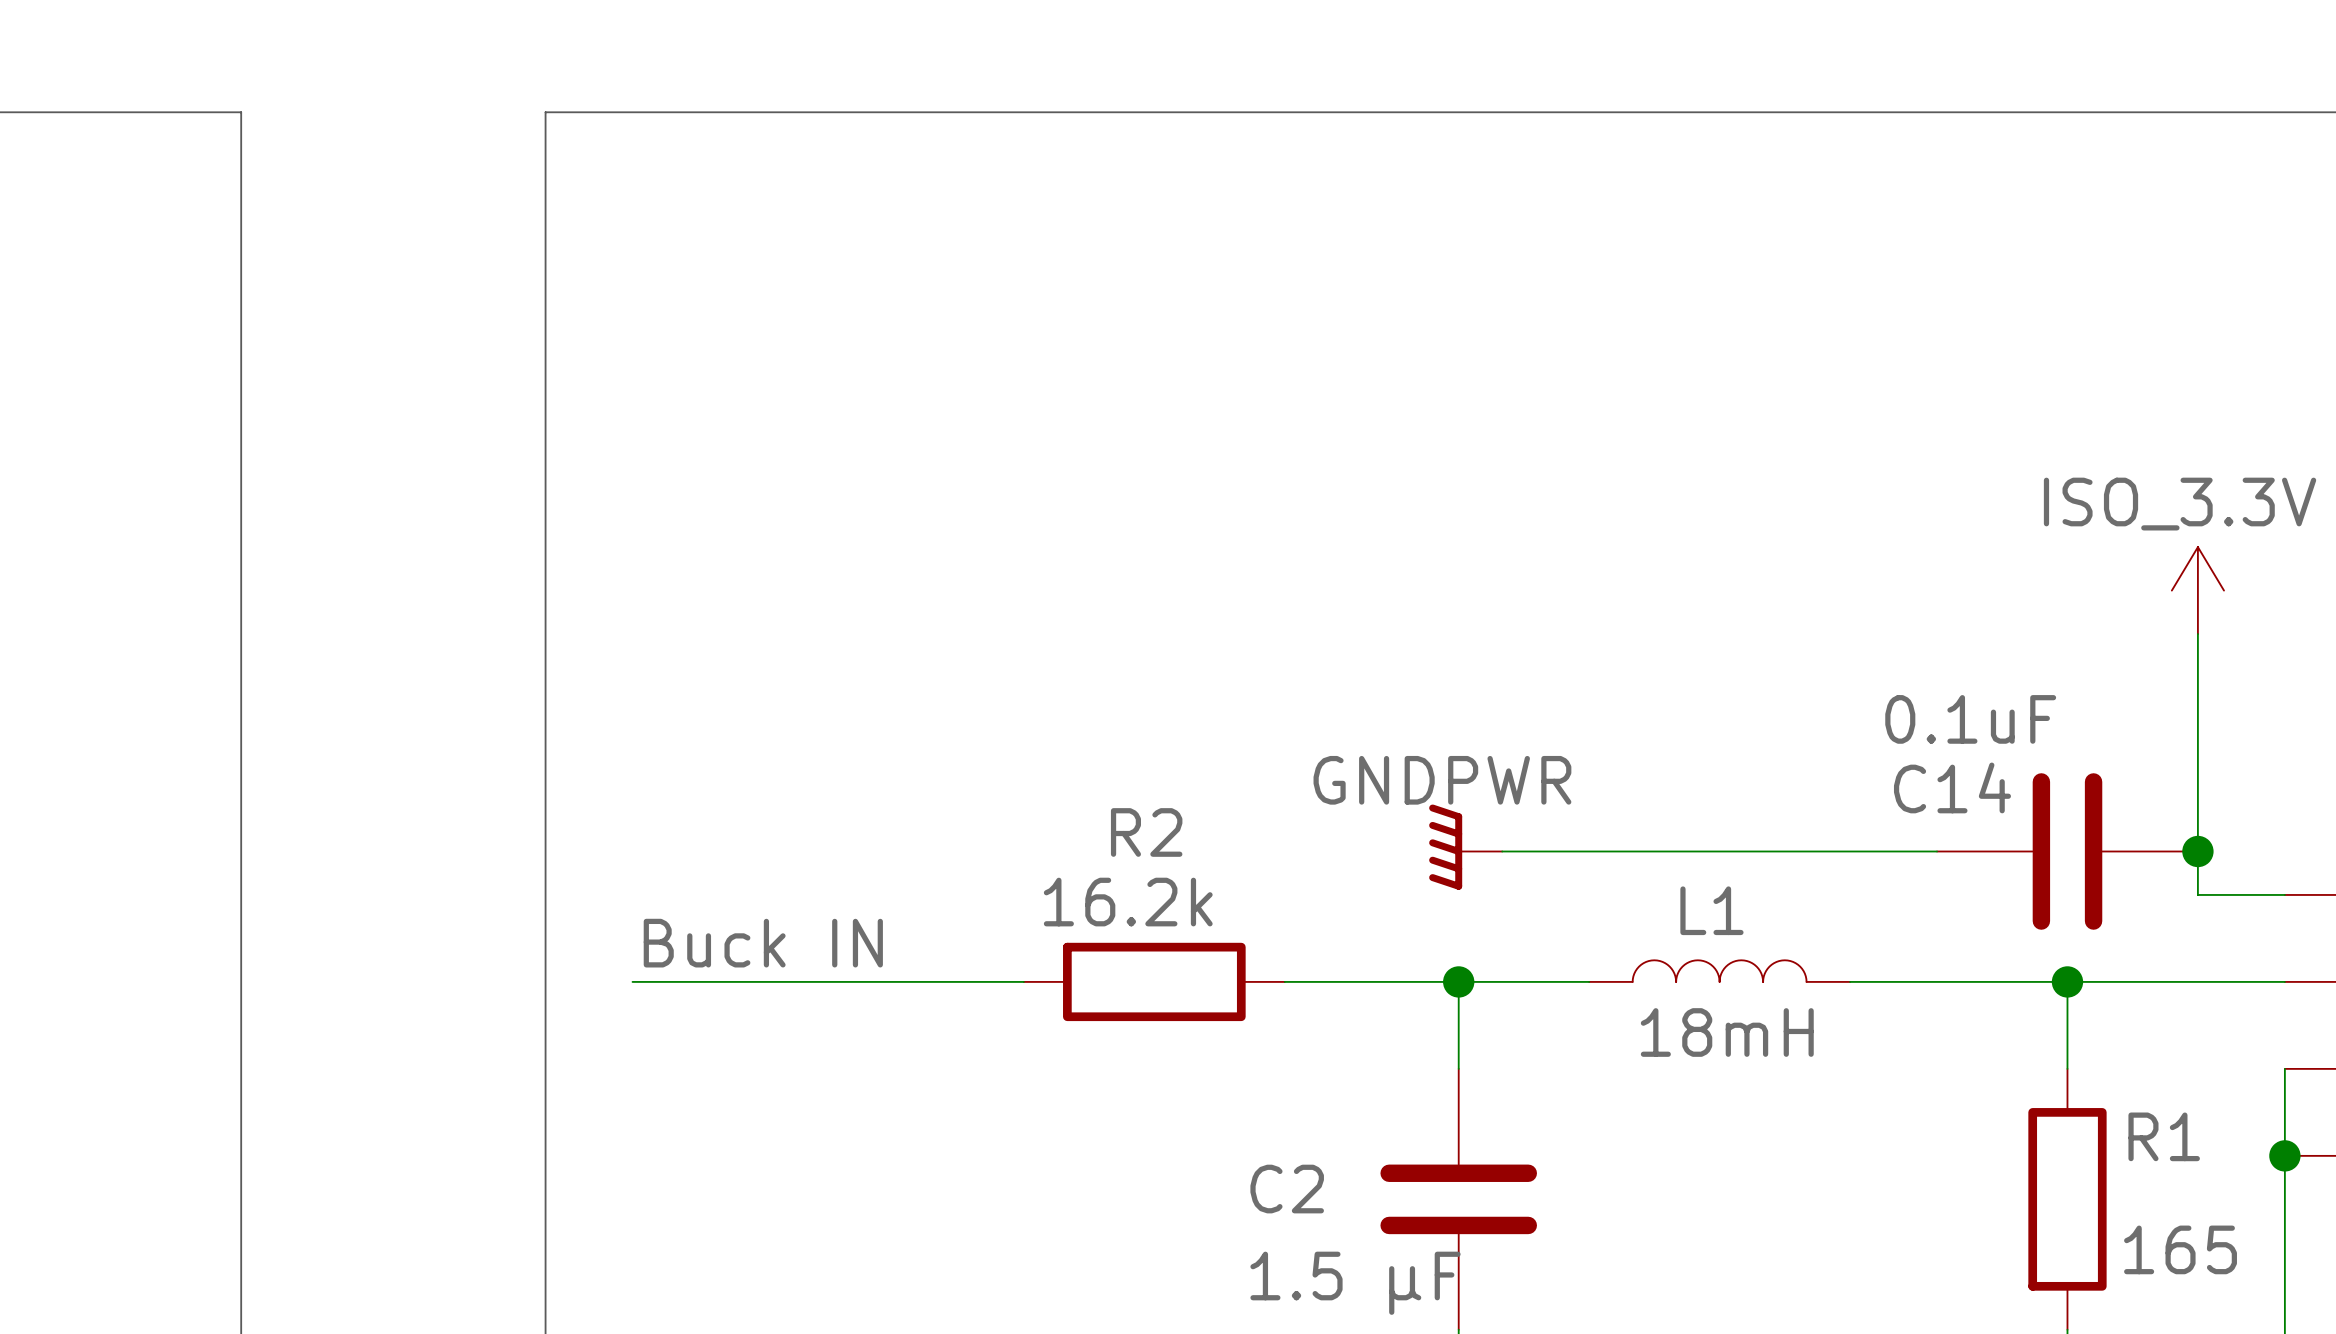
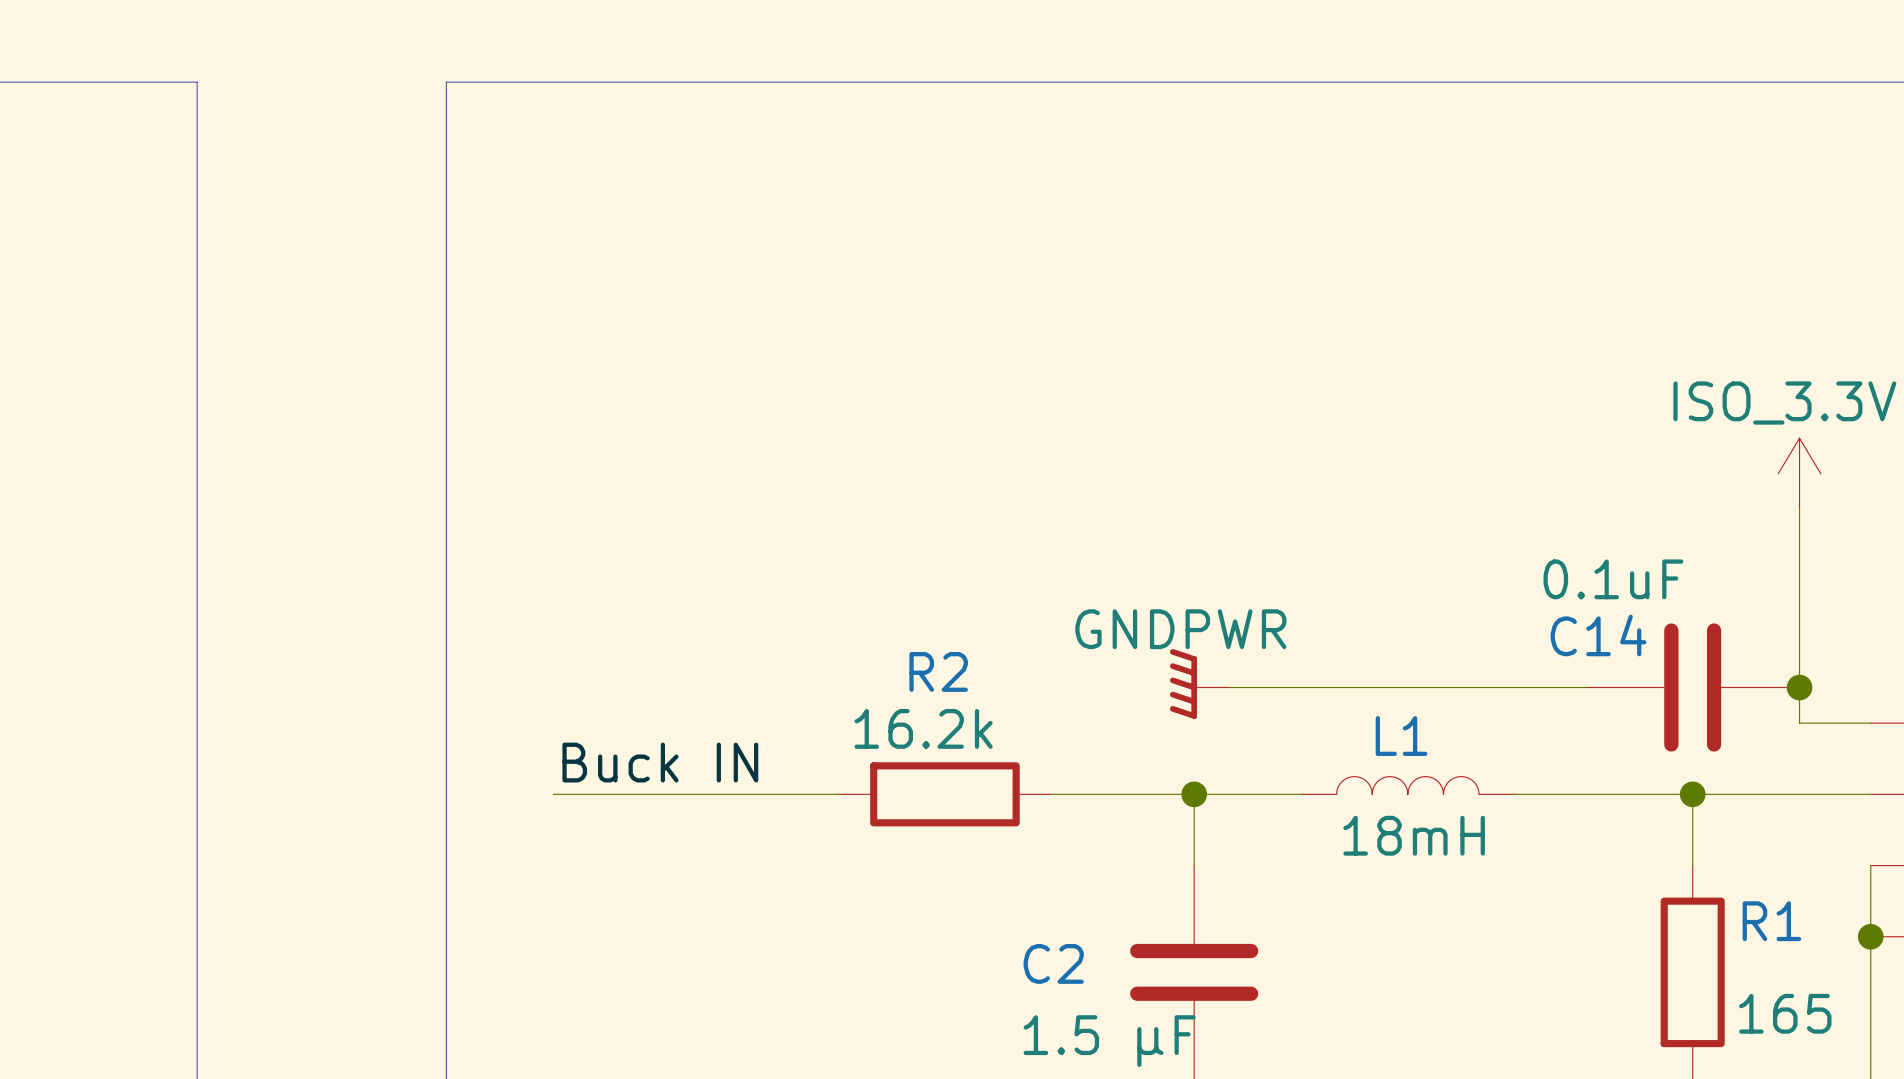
label position: Buck IN (763, 943) -> Buck IN (660, 762)
wire: (632, 981) (676, 981) -> none

